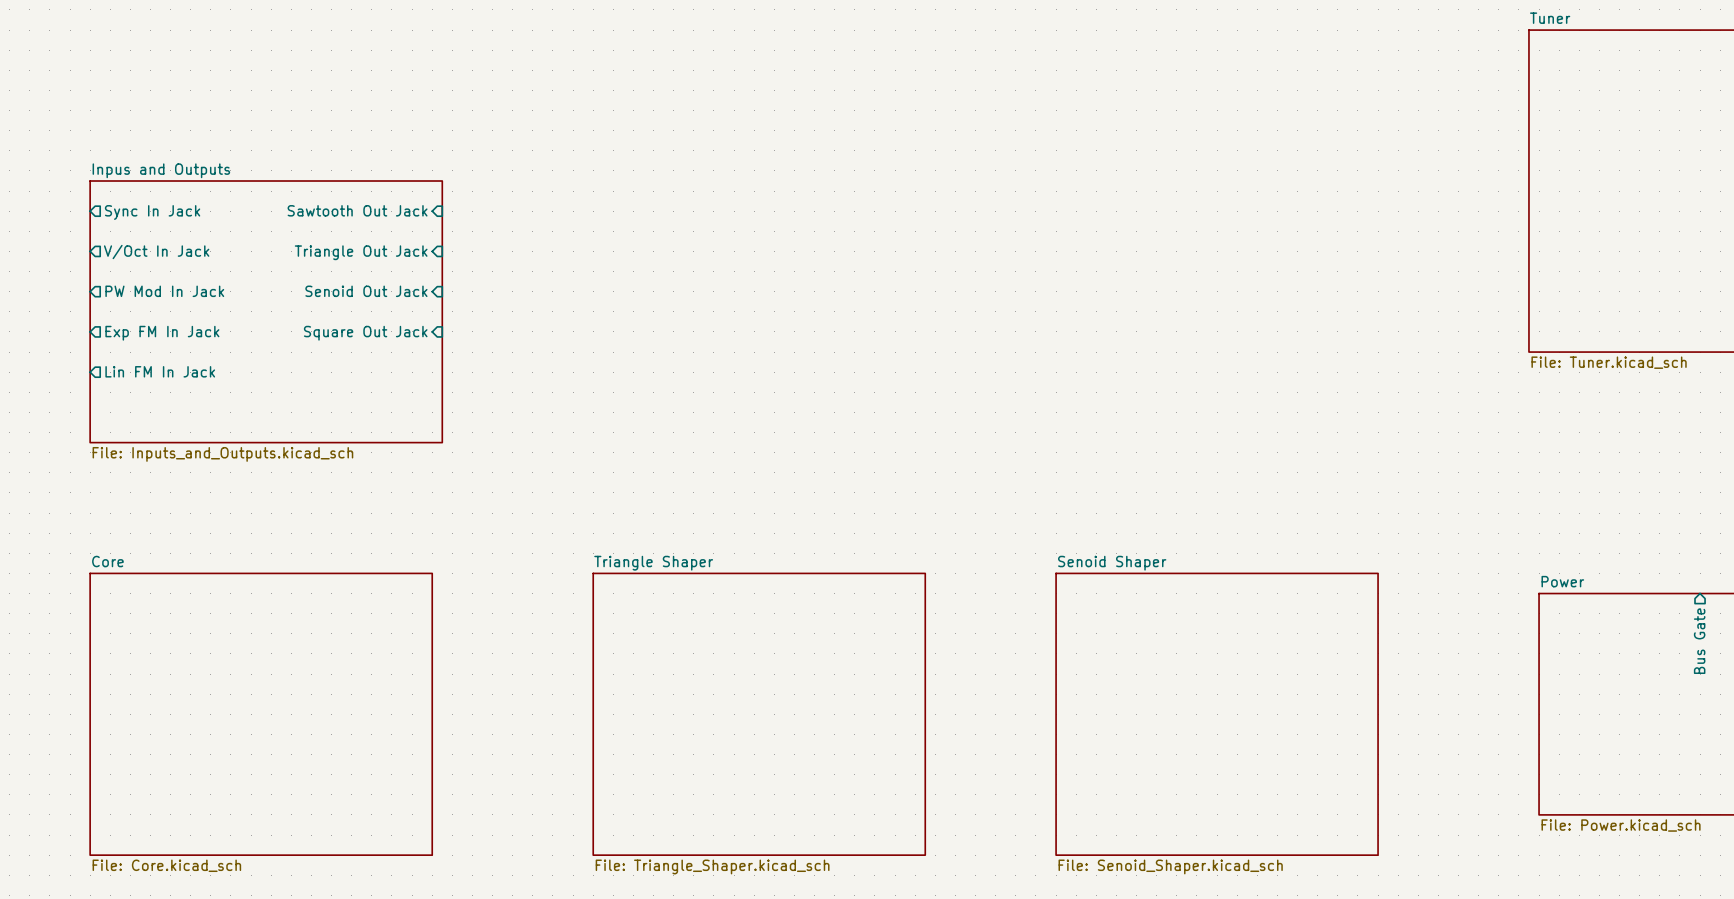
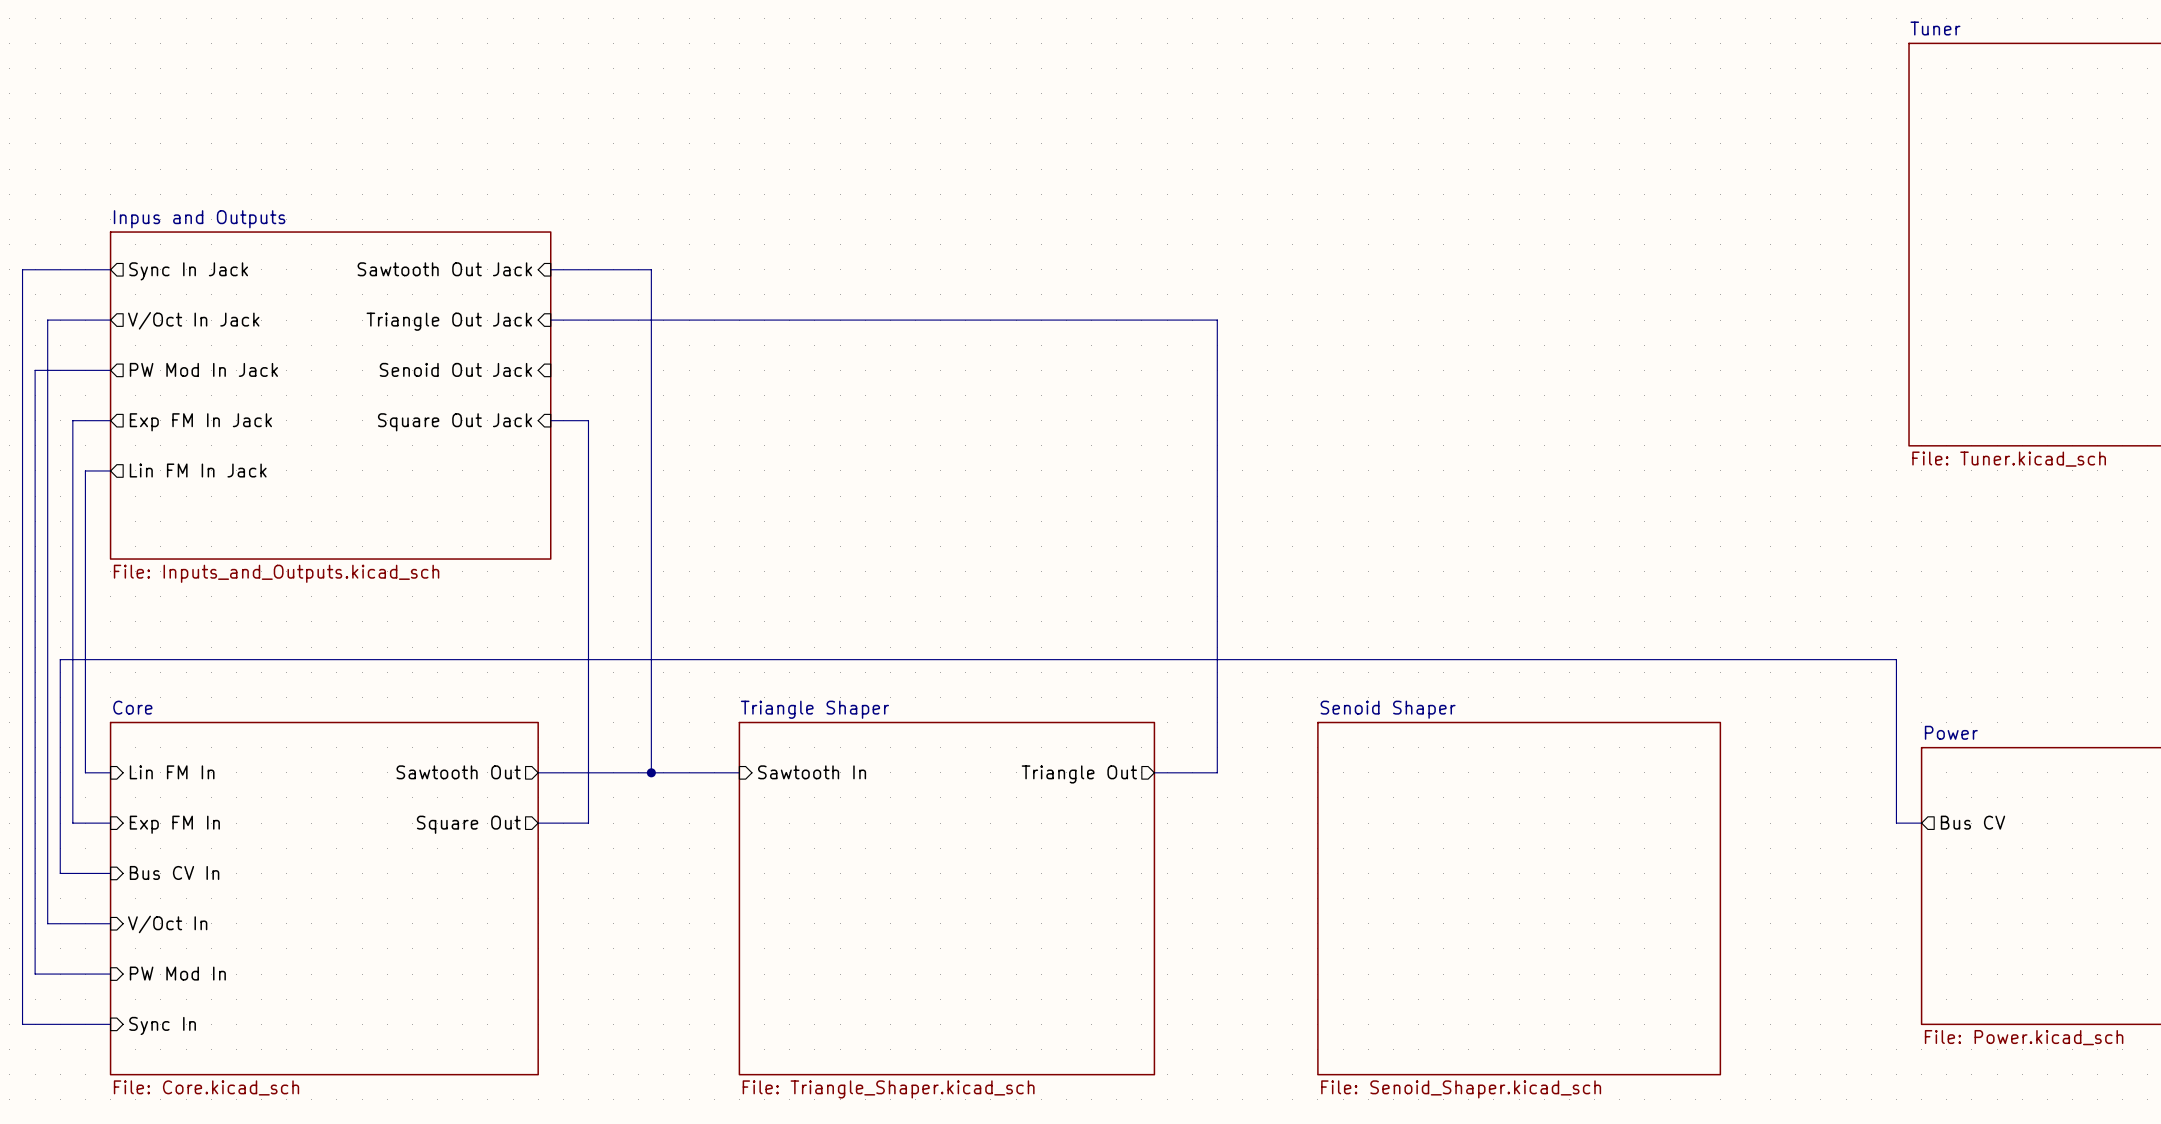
wire: none -> (110, 269) (22, 269) (22, 1024) (110, 1024)
wire: none -> (550, 269) (651, 269) (651, 772)
wire: none -> (110, 320) (47, 320) (47, 923) (110, 923)
wire: none -> (550, 320) (1217, 320) (1217, 772) (1154, 772)
wire: none -> (110, 370) (35, 370) (35, 974) (110, 974)
wire: none -> (110, 420) (72, 420) (72, 823) (110, 823)
wire: none -> (550, 420) (588, 420) (588, 823) (538, 823)
wire: none -> (110, 470) (85, 470) (85, 772) (110, 772)
sheet pin: none -> Lin FM In (172, 772)
sheet pin: none -> Sawtooth Out (458, 772)
wire: none -> (538, 772) (739, 772)
junction: none -> (651, 772)
sheet pin: none -> Sawtooth In (812, 772)
sheet pin: none -> Triangle Out (1079, 774)
sheet pin: Bus Gate (1699, 641) -> none
wire: none -> (1921, 823) (1896, 823) (1896, 659) (60, 659) (60, 873) (110, 873)
sheet pin: none -> Bus CV (1972, 822)
sheet pin: none -> Exp FM In (174, 824)
sheet pin: none -> Square Out (468, 824)
sheet pin: none -> Bus CV In (174, 872)
sheet pin: none -> V/Oct In (167, 924)
sheet pin: none -> PW Mod In (177, 973)
sheet pin: none -> Sync In (162, 1025)

